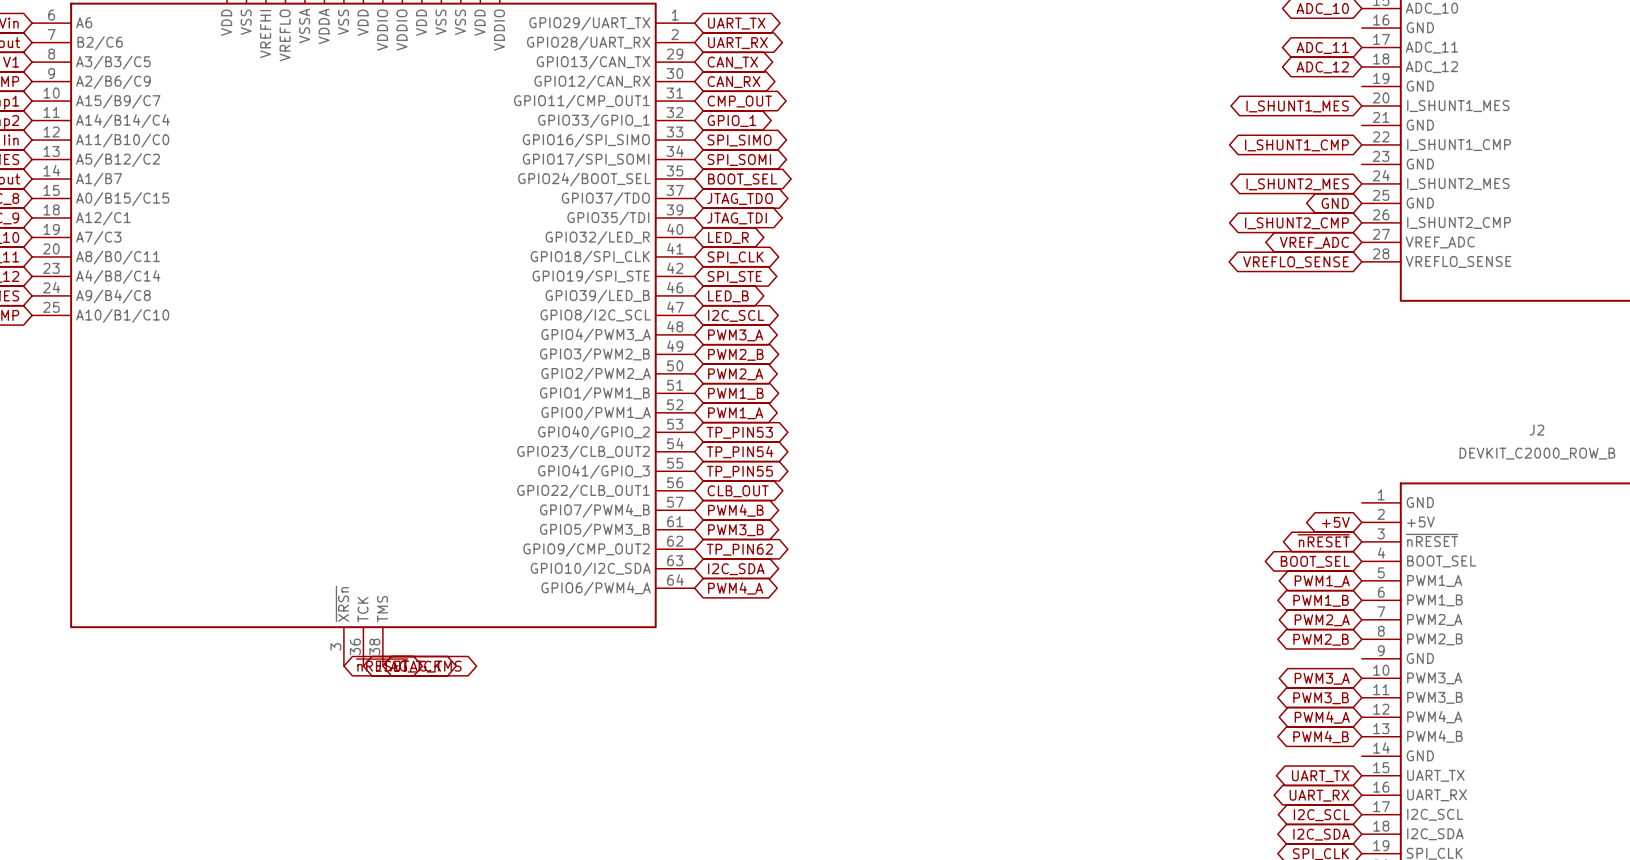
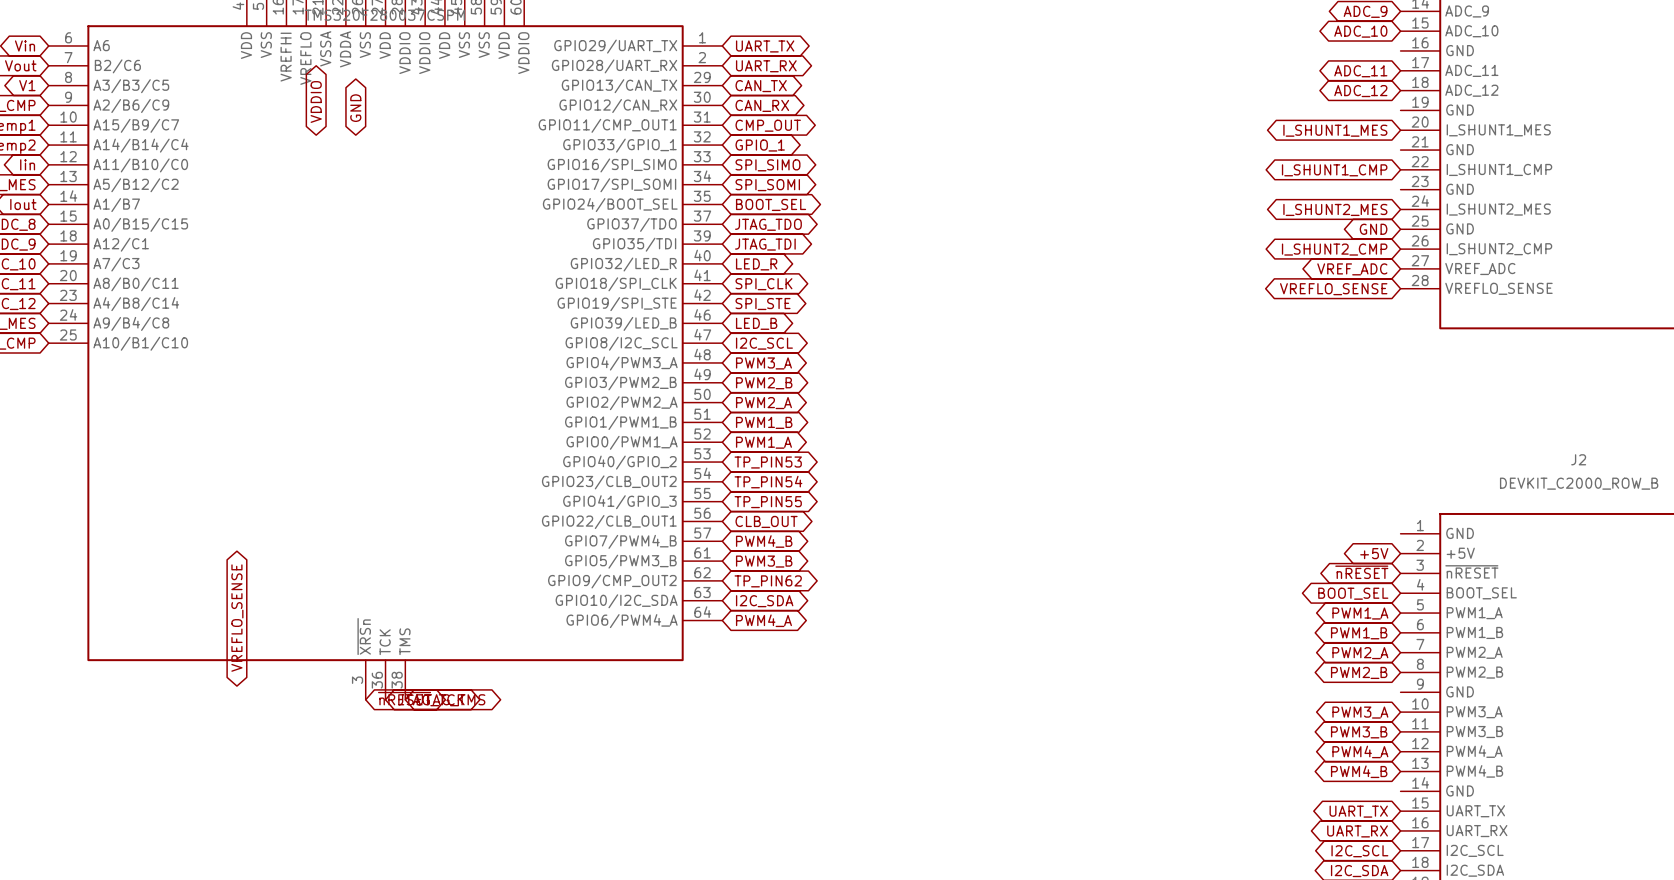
global label: none -> VDDIO (316, 101)
global label: none -> GND (355, 108)
global label: none -> VREFLO_SENSE (237, 618)

